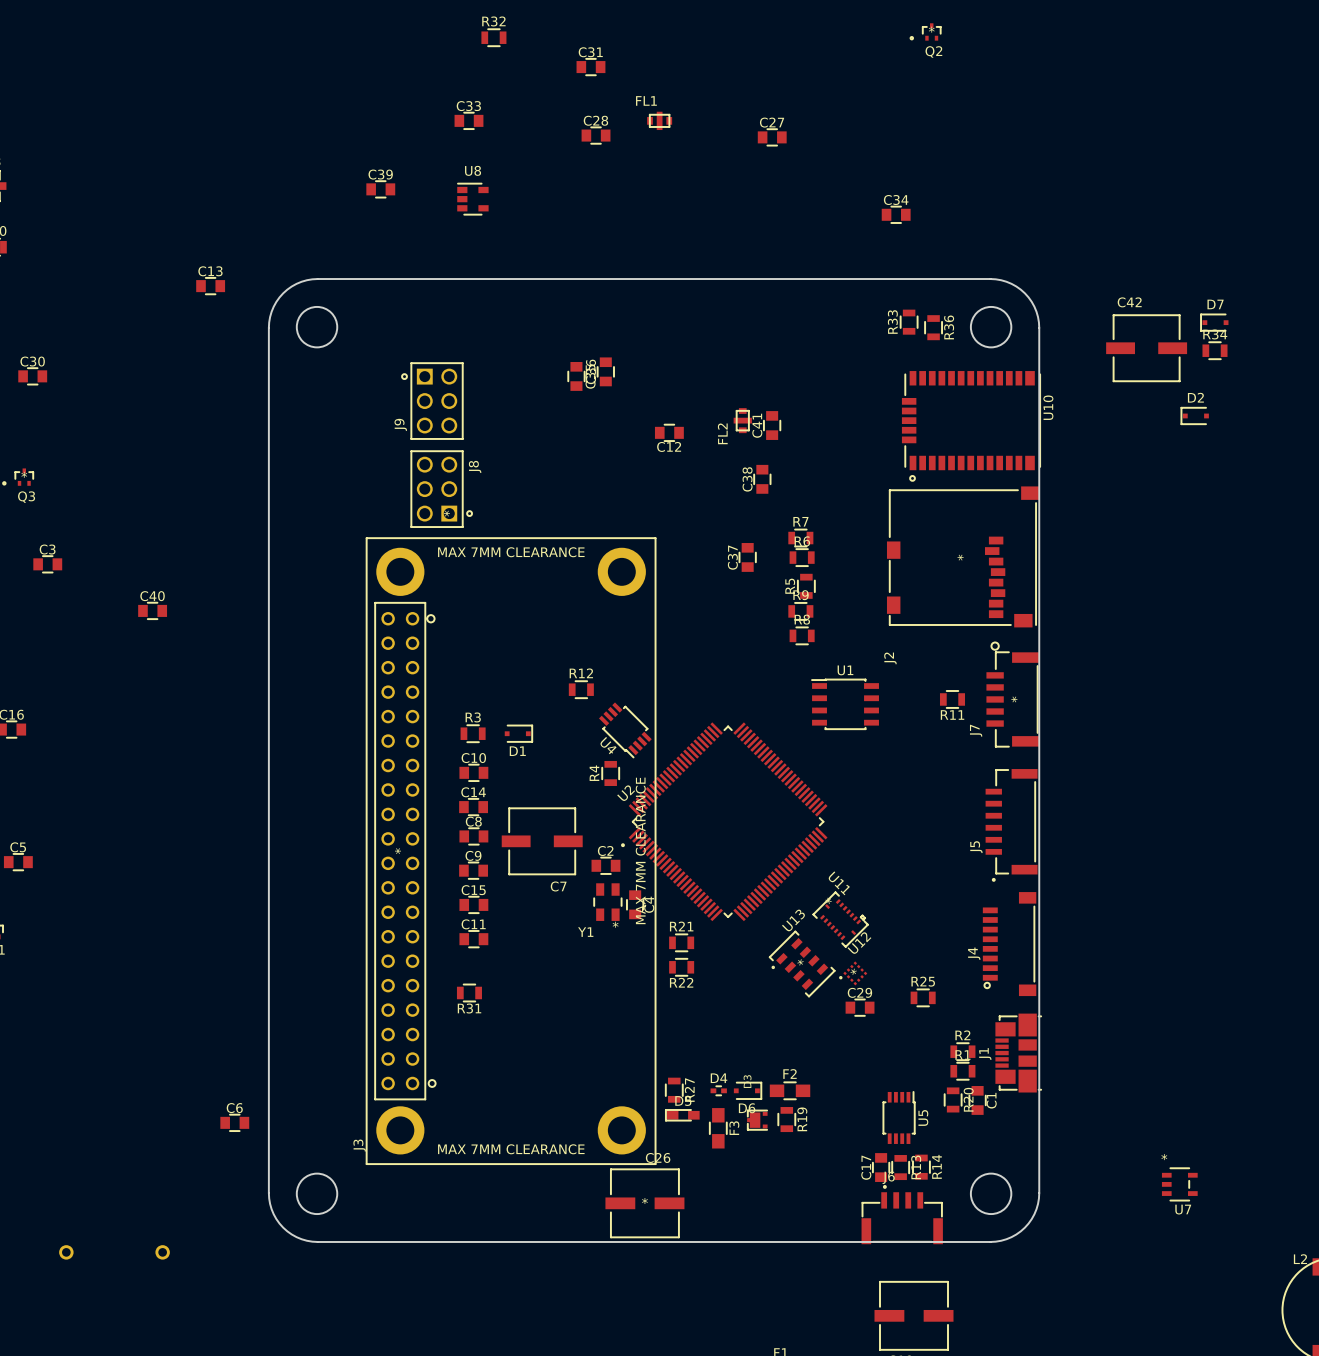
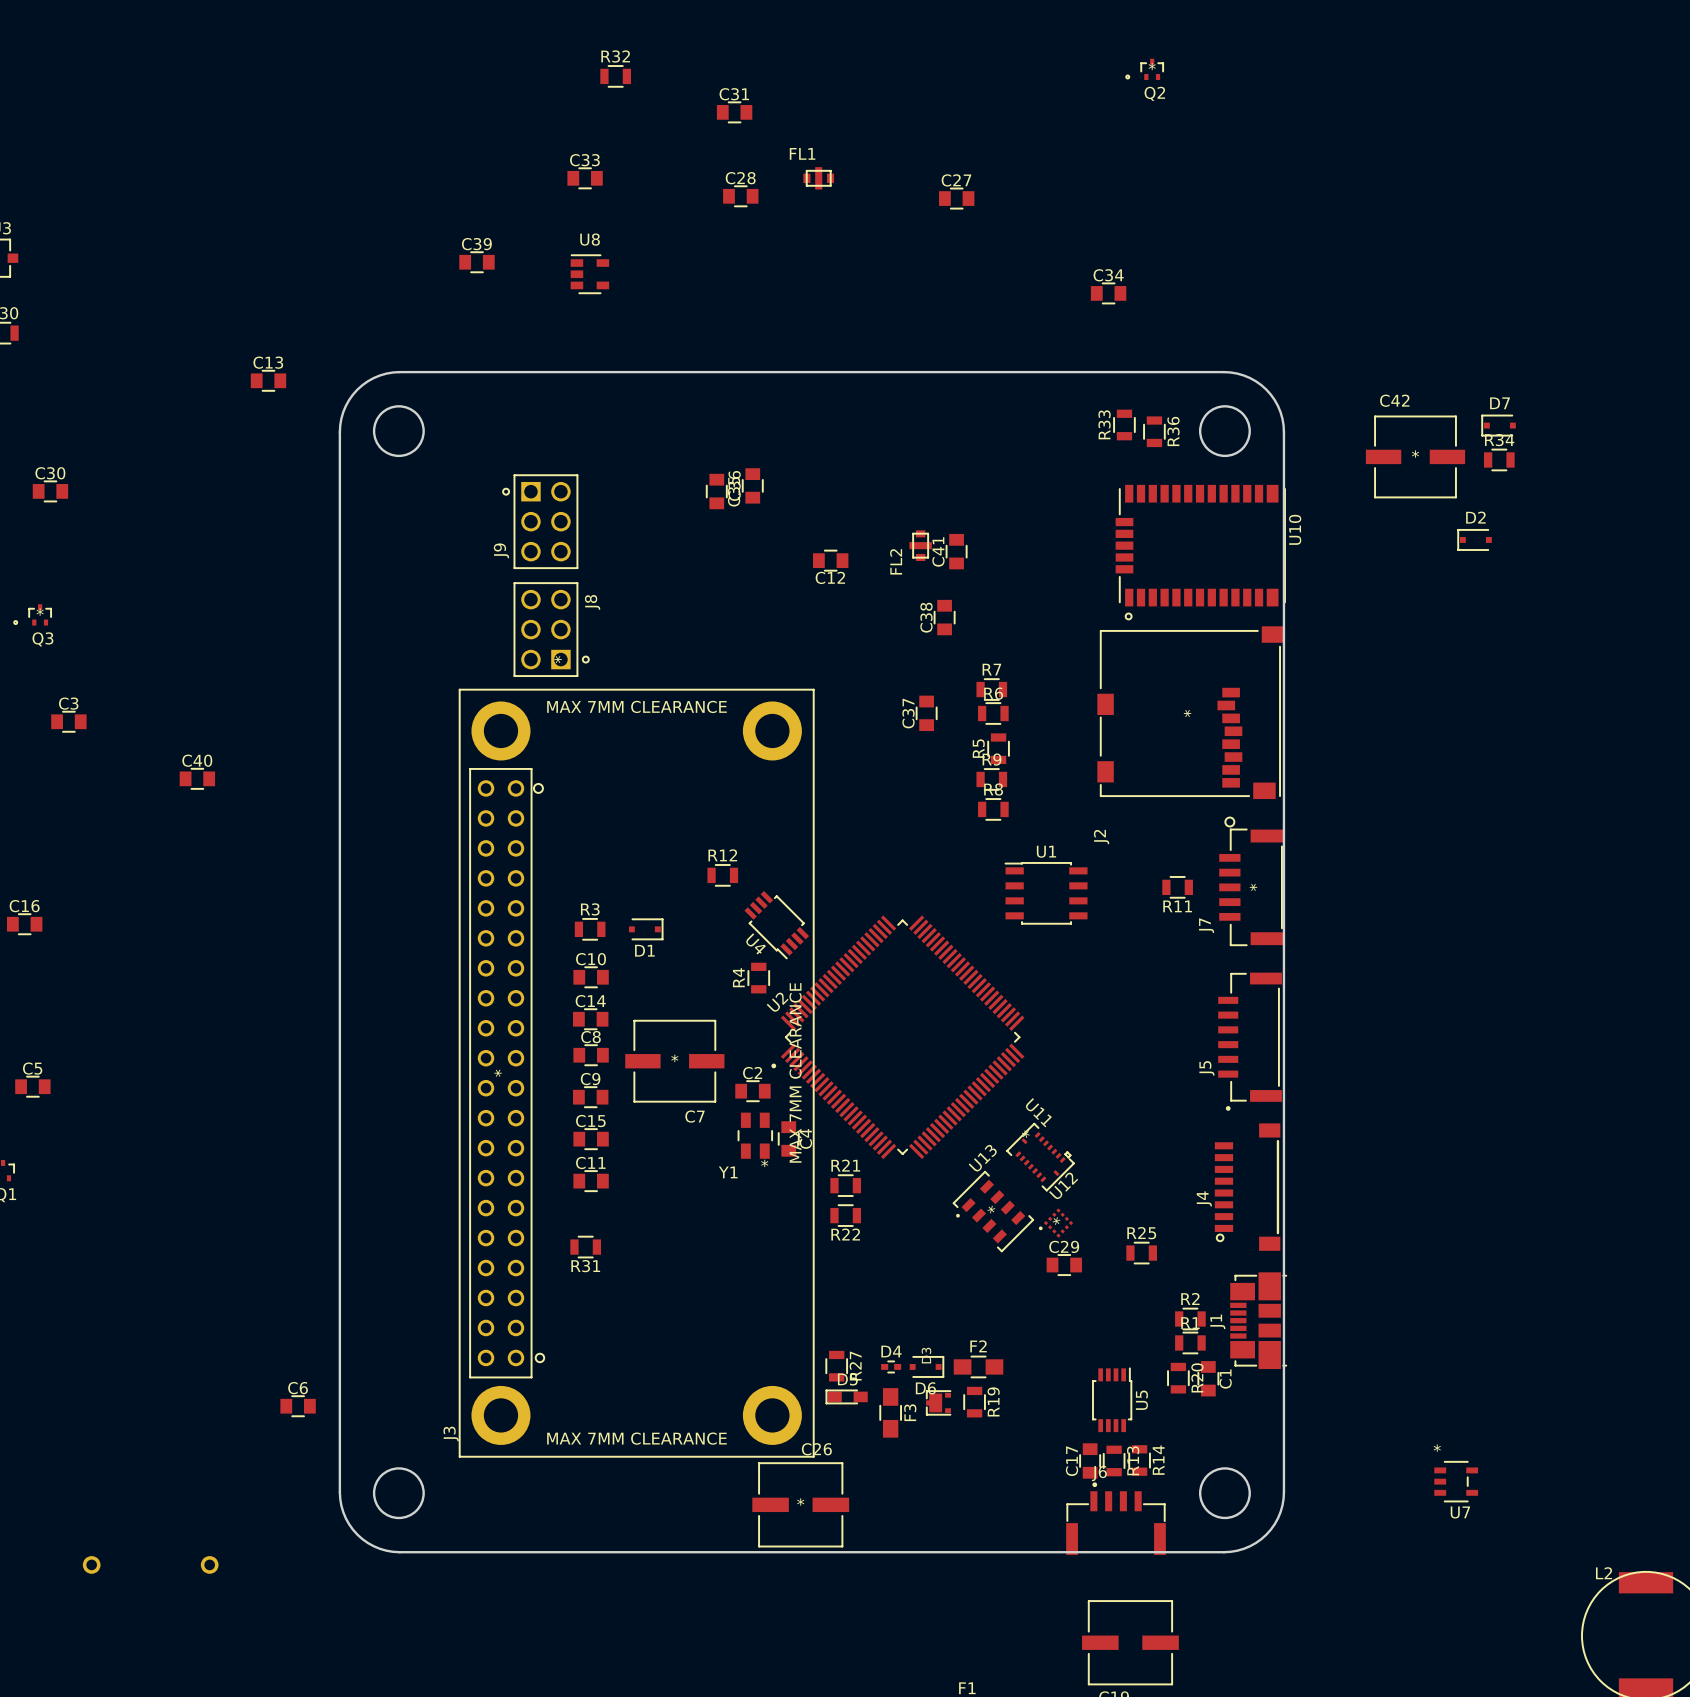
C42 text: none -> * (1415, 454)
C7 text: none -> * (674, 1058)

